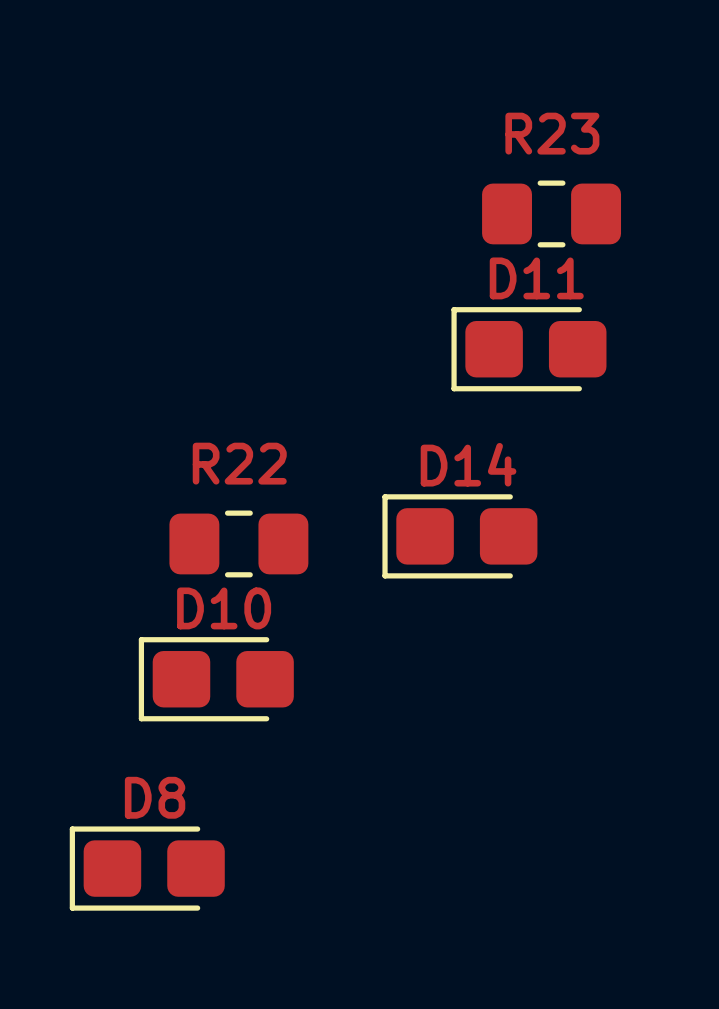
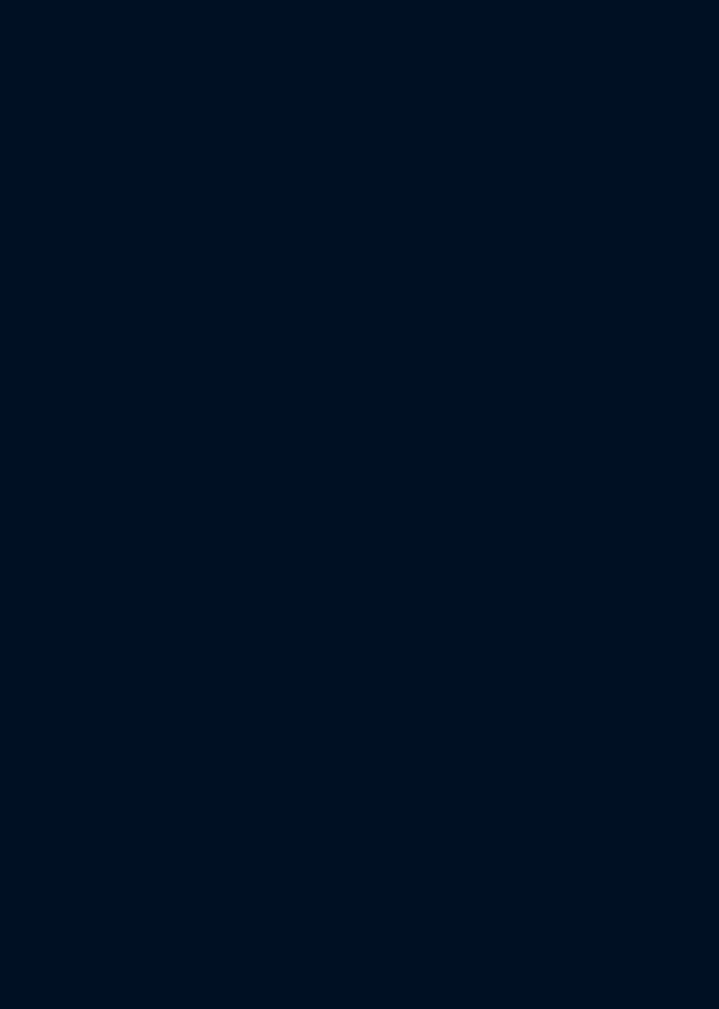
R23: (551, 213) -> none
D11: (528, 349) -> none
D14: (459, 536) -> none
R22: (238, 543) -> none
D10: (216, 679) -> none
D8: (147, 868) -> none

